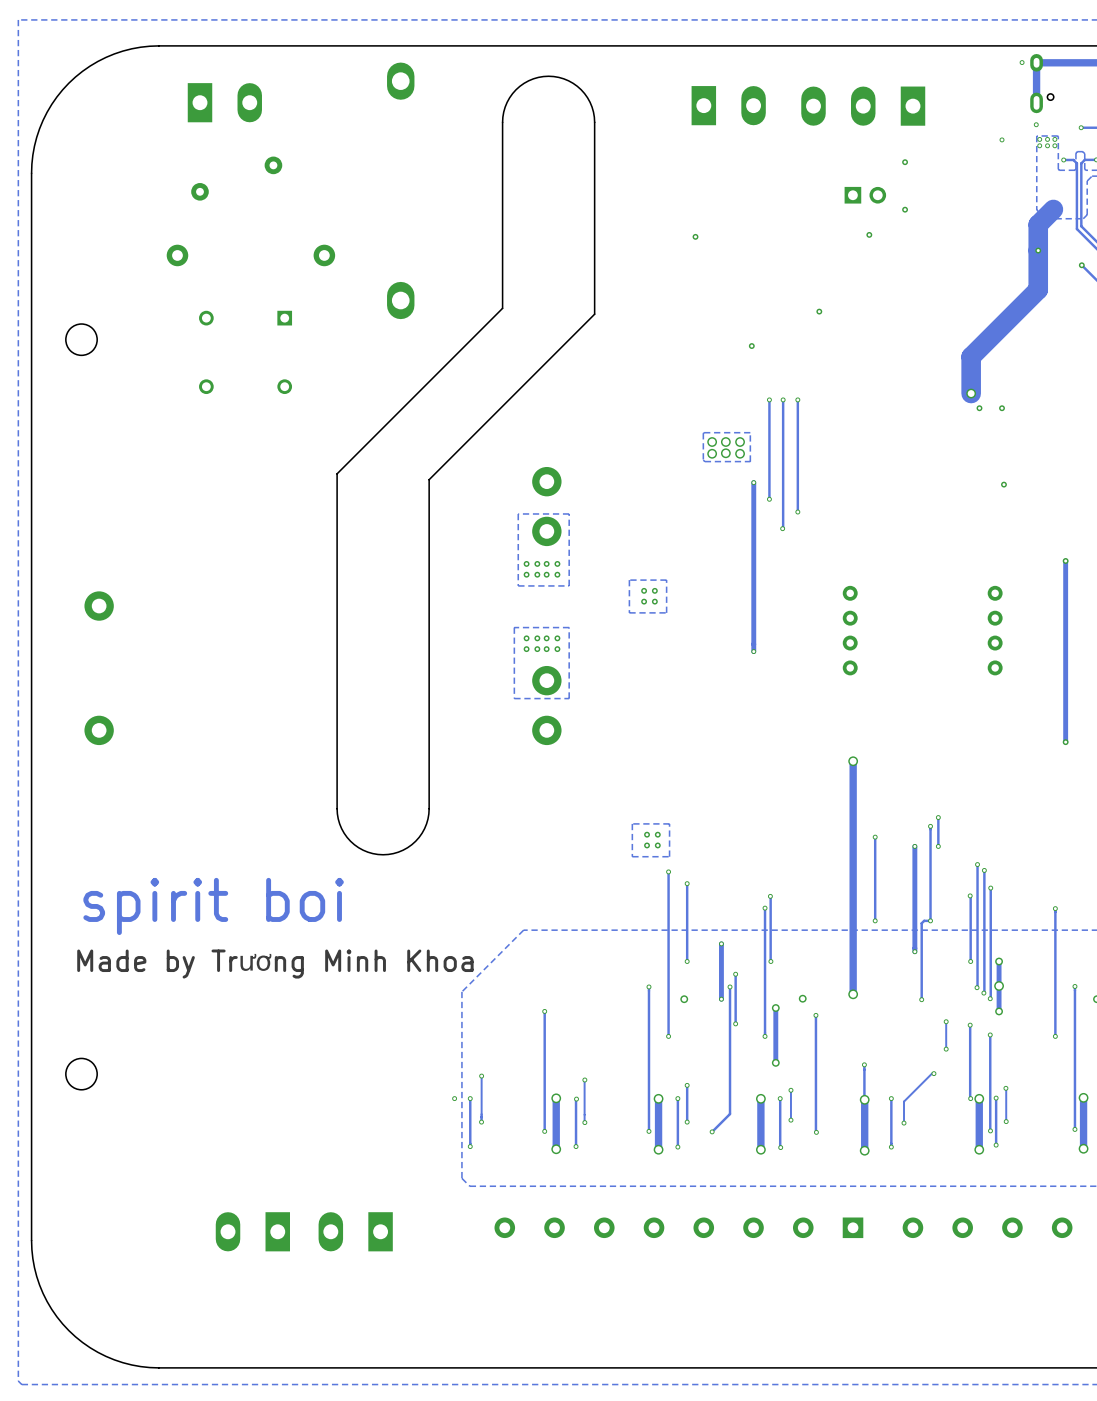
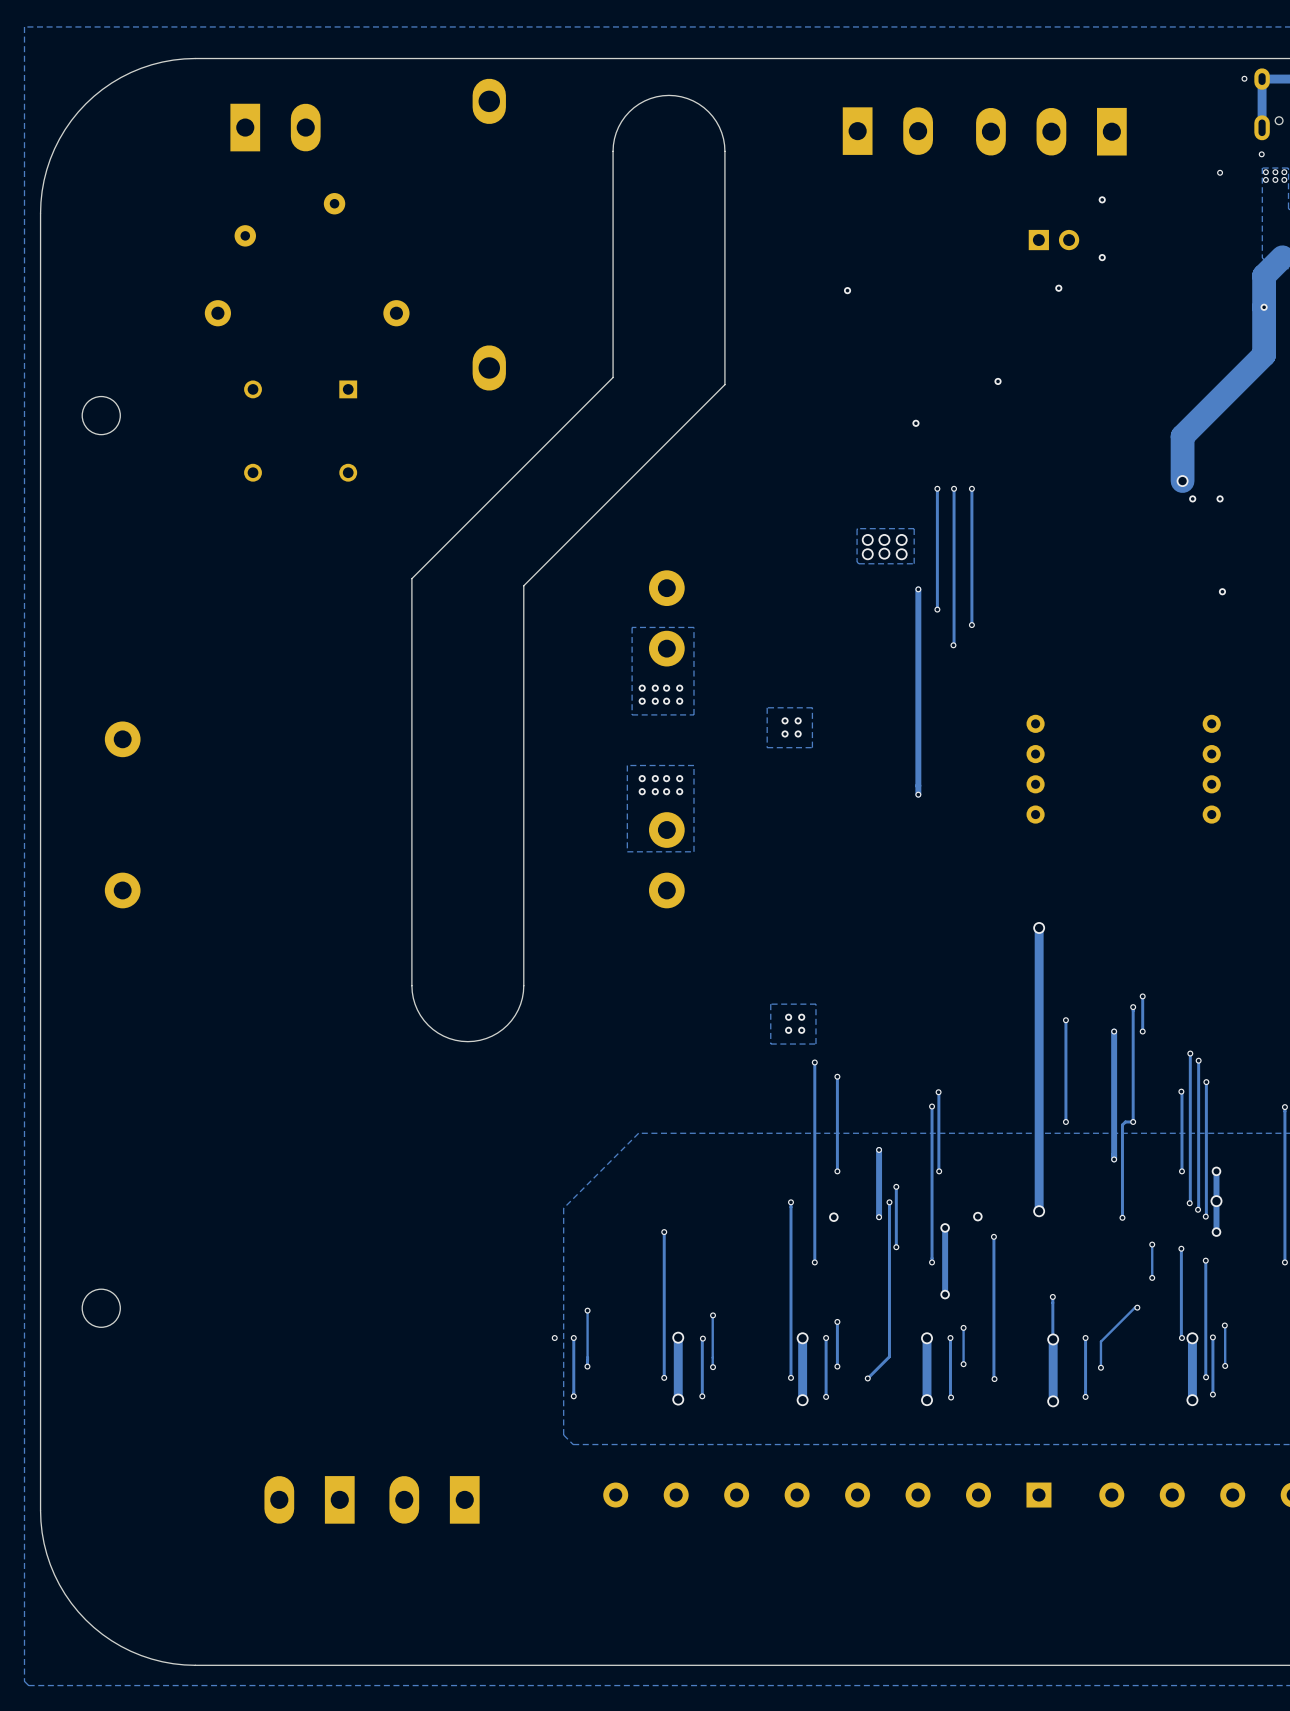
text: spirit boi (213, 906) -> none
text: Made by Trương Minh Khoa (275, 964) -> none

